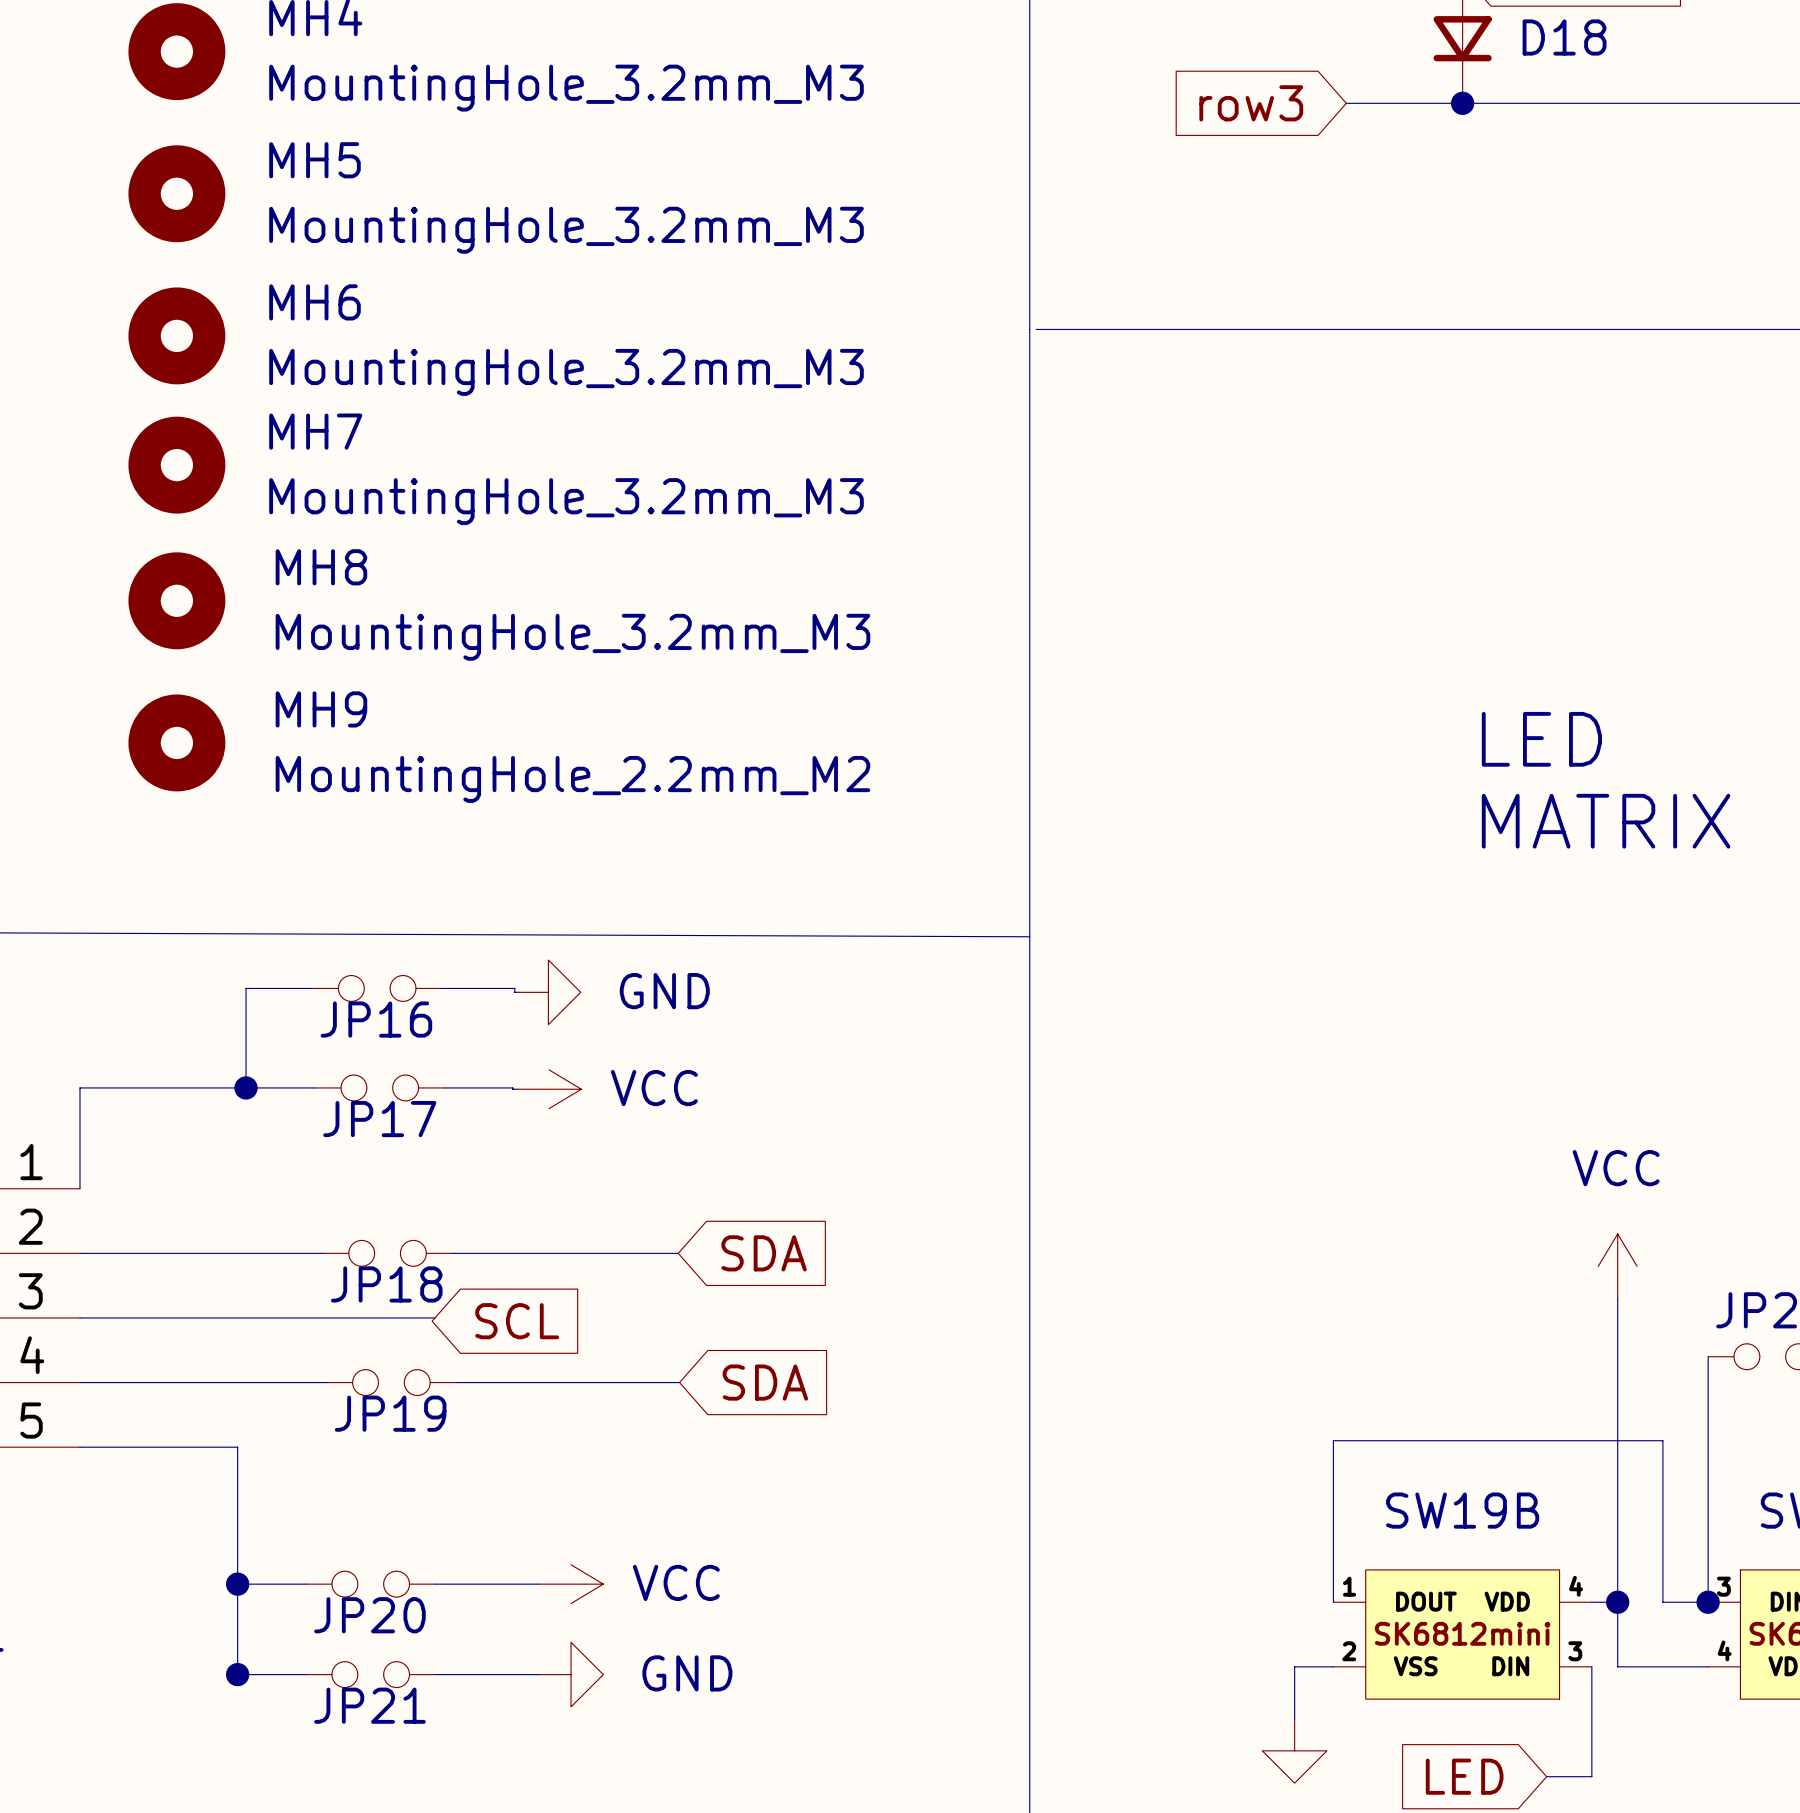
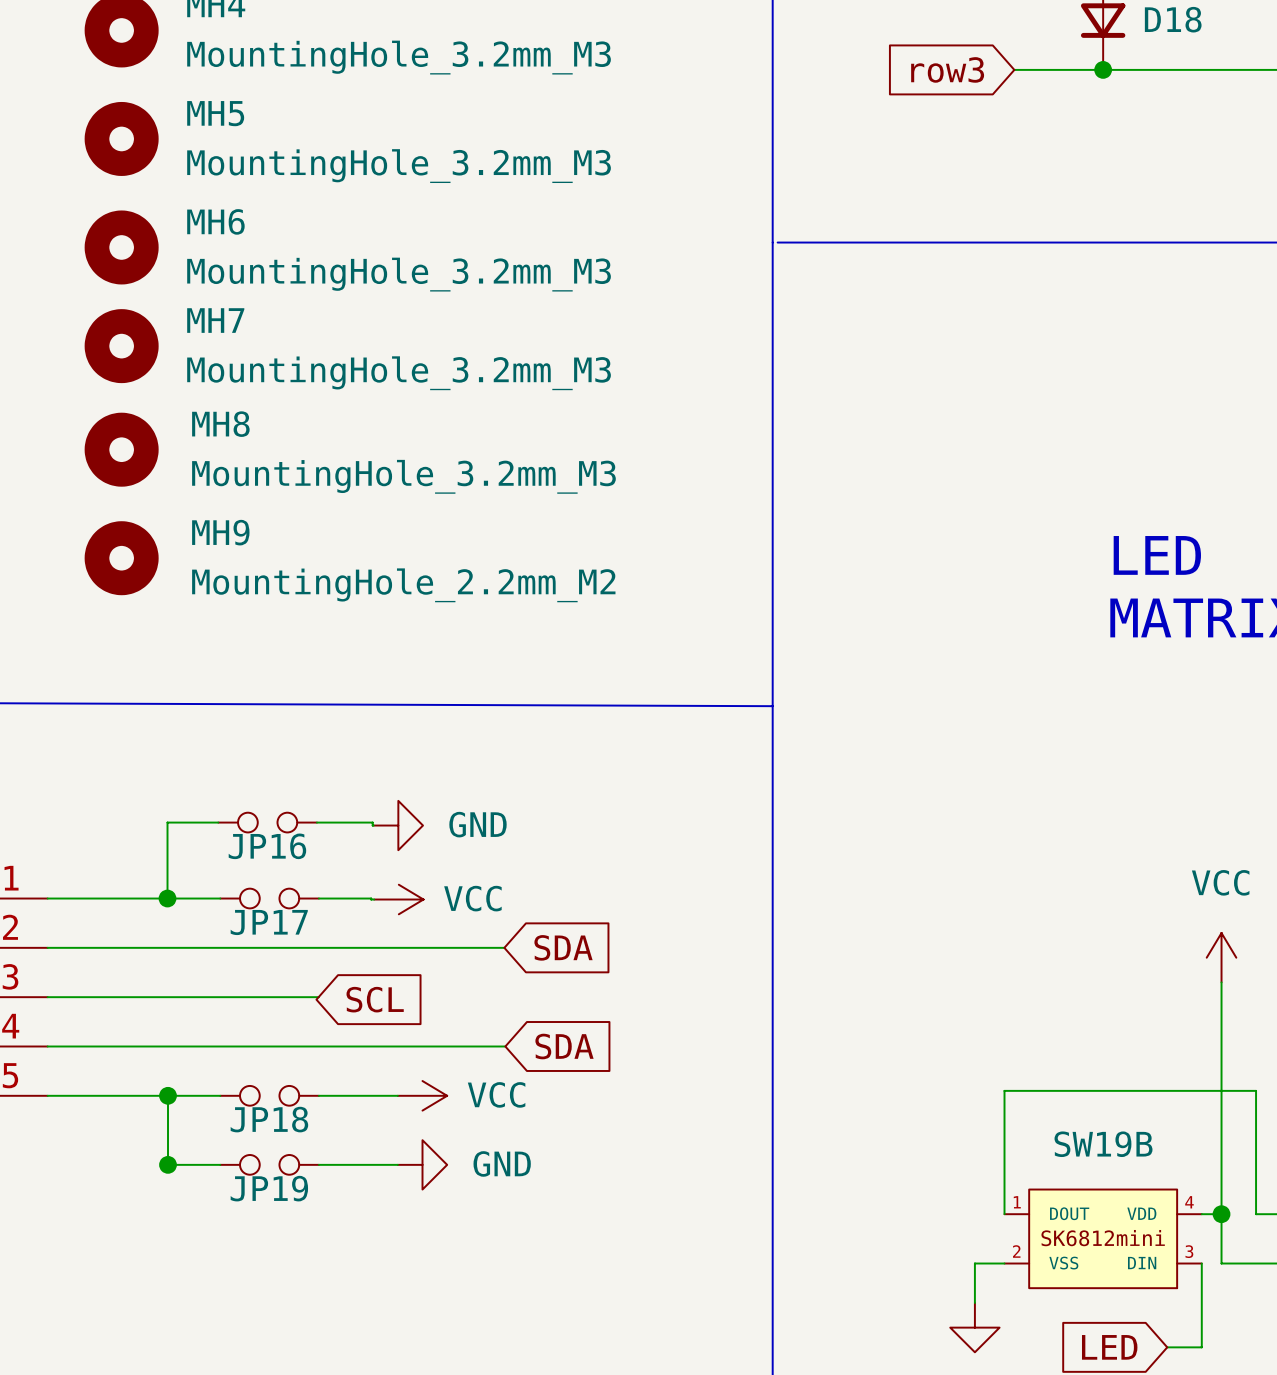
wire: (312, 988) (246, 988) (246, 1087) -> (218, 822) (167, 822) (167, 898)
JP16 position: (377, 988) -> (267, 822)
wire: (441, 988) (514, 988) (516, 992) -> (316, 822) (372, 822) (373, 825)
power symbol: GND (548, 992) -> none
junction position: (246, 1087) -> (167, 898)
wire: (315, 1087) (79, 1087) (79, 1188) -> (220, 898) (47, 898)
JP17 position: (379, 1087) -> (269, 898)
wire: (444, 1087) (516, 1089) -> (318, 898) (374, 899)
power symbol: VCC (549, 1089) -> GND (398, 825)
power symbol: none -> VCC (398, 899)
wire: none -> (233, 947) (331, 947)
JP18 position: (387, 1253) -> (269, 1095)
wire: none -> (236, 1046) (334, 1046)
JP19 position: (391, 1382) -> (269, 1164)
junction: none -> (168, 1095)
wire: (237, 1538) (237, 1675) -> none
wire: (237, 1584) (306, 1584) -> (168, 1095) (220, 1095)
junction position: (237, 1584) -> (168, 1164)
JP20: (370, 1584) -> none
wire: (435, 1584) (538, 1584) -> (318, 1095) (397, 1095)
power symbol position: VCC (571, 1584) -> VCC (422, 1095)
wire: (237, 1674) (306, 1674) -> (168, 1164) (220, 1164)
junction: (237, 1674) -> none
JP21: (370, 1674) -> none
wire: (435, 1674) (538, 1674) -> (318, 1164) (397, 1164)
power symbol position: GND (571, 1674) -> GND (422, 1164)

